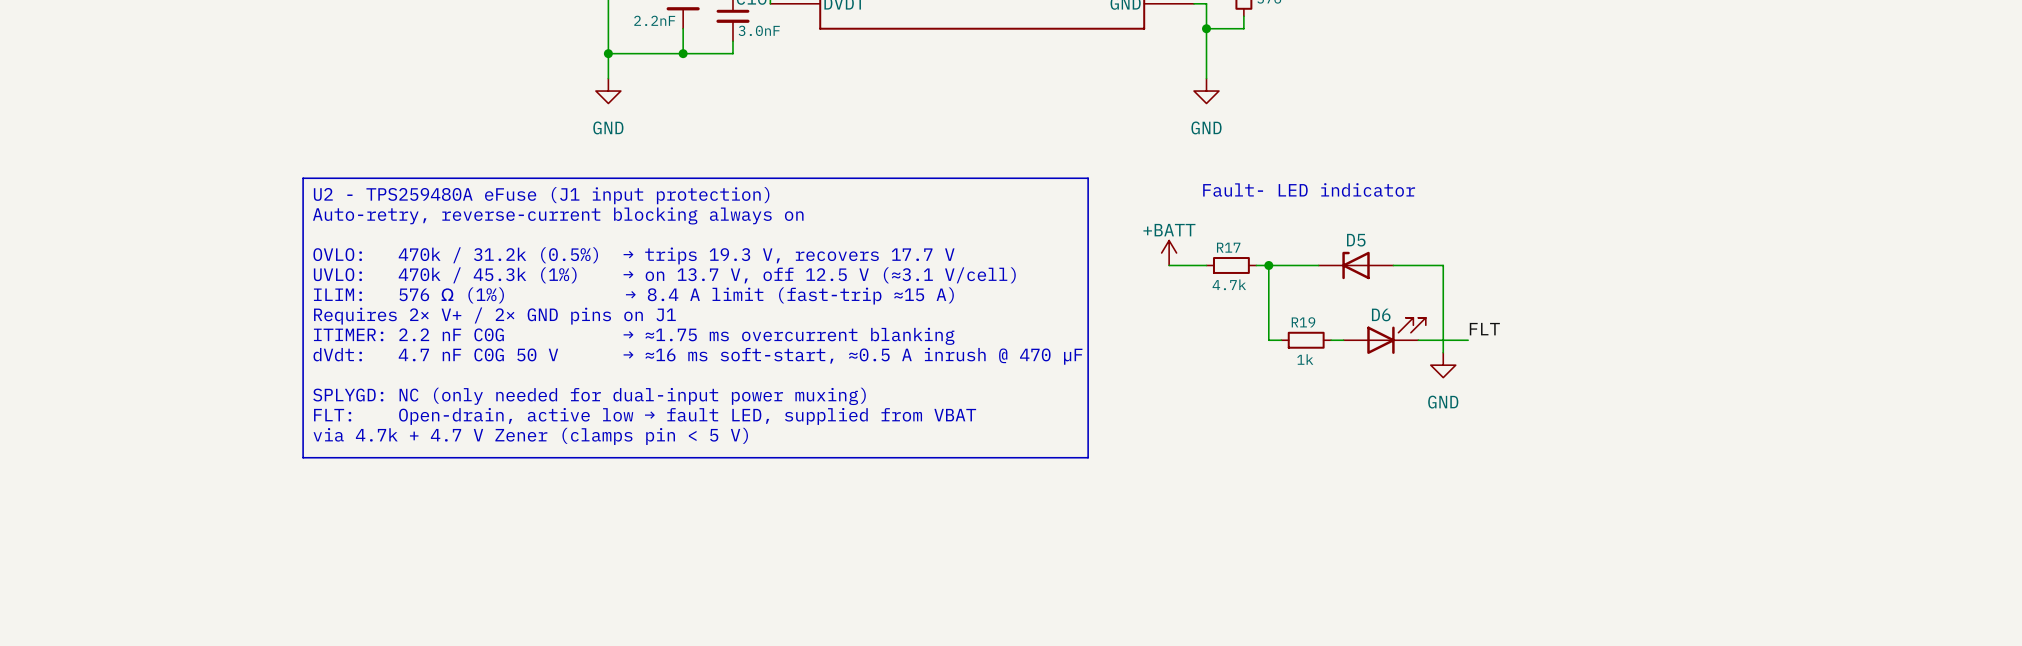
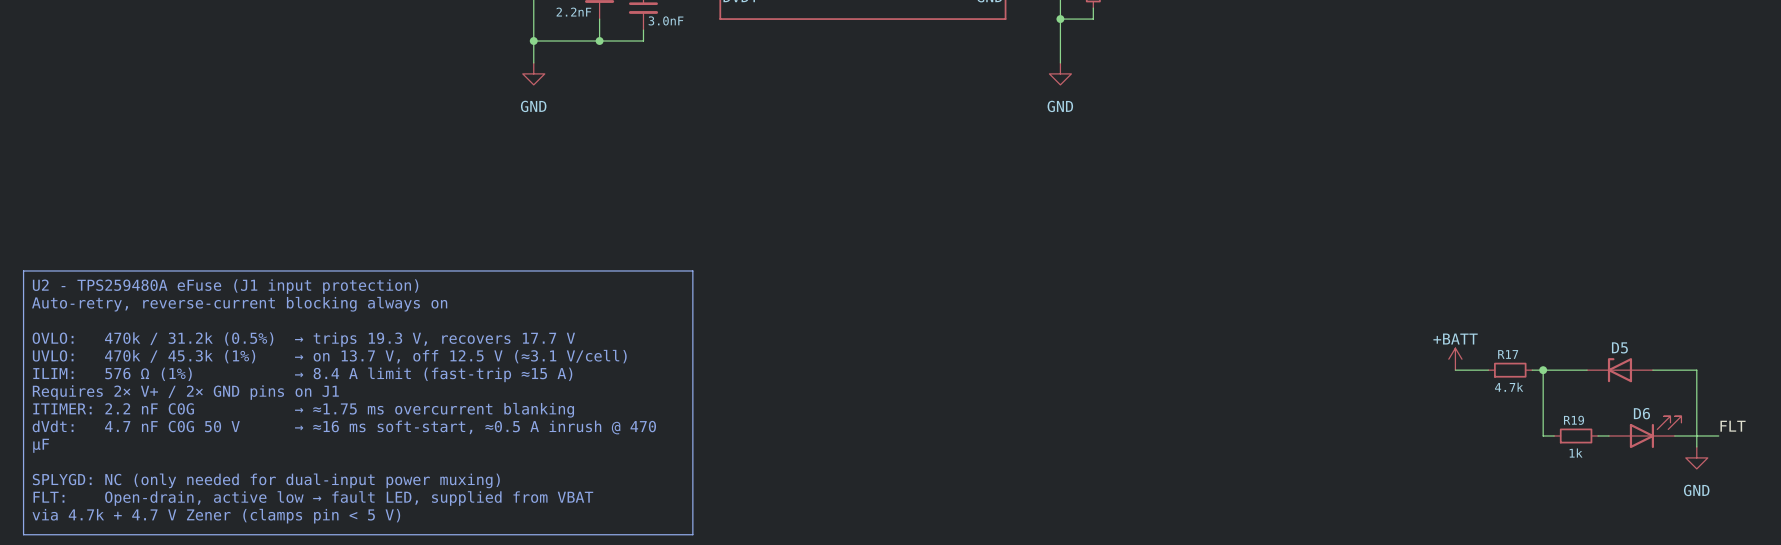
line: (303, 178) (1088, 178) (1088, 457) (303, 457) (303, 178) -> none
text: Fault- LED indicator (1309, 189) -> none
text: U2 - TPS259480A eFuse (J1 input protection) (541, 195) -> none
text: Auto-retry, reverse-current blocking always on (558, 215) -> none
power symbol: +BATT (1169, 253) -> none
text: OVLO: 470k / 31.2k (0.5%) → trips 19.3 V, recovers 17.7 V (633, 255) -> none
wire: (1169, 265) (1206, 265) -> none
R17 position: (1231, 265) -> (1510, 370)
wire: (1256, 265) (1318, 265) -> none
wire: (1268, 265) (1268, 340) (1281, 340) -> none
junction: (1268, 265) -> none
D5 position: (1356, 265) -> (1619, 370)
wire: (1393, 265) (1443, 265) (1443, 352) -> none
text: UVLO: 470k / 45.3k (1%) → on 13.7 V, off 12.5 V (≈3.1 V/cell) (664, 275) -> none
text: ILIM: 576 Ω (1%) → 8.4 A limit (fast-trip ≈15 A) (633, 295) -> none
line: none -> (23, 270) (692, 270) (692, 534) (23, 534) (23, 270)
text: Requires 2× V+ / 2× GND pins on J1 (494, 316) -> none
label: FLT (1484, 329) -> none
text: none -> U2 - TPS259480A eFuse (J1 input protection) (225, 286)
D6 position: (1384, 335) -> (1645, 432)
text: ITIMER: 2.2 nF C0G → ≈1.75 ms overcurrent blanking (634, 336) -> none
R19 position: (1306, 340) -> (1576, 435)
wire: (1331, 340) (1343, 340) -> none
wire: (1418, 340) (1468, 340) -> none
text: none -> Auto-retry, reverse-current blocking always on (239, 304)
text: dVdt: 4.7 nF C0G 50 V → ≈16 ms soft-start, ≈0.5 A inrush @ 470 µF (697, 356) -> none
power symbol: GND (1443, 365) -> none
text: none -> OVLO: 470k / 31.2k (0.5%) → trips 19.3 V, recovers 17.7 V (303, 339)
text: SPLYGD: NC (only needed for dual-input power muxing) (589, 396) -> none
text: none -> UVLO: 470k / 45.3k (1%) → on 13.7 V, off 12.5 V (≈3.1 V/cell) (329, 356)
power symbol: none -> +BATT (1455, 359)
text: FLT: Open-drain, active low → fault LED, supplied from VBAT (645, 416) -> none
wire: none -> (1455, 370) (1488, 370)
wire: none -> (1532, 370) (1587, 370)
wire: none -> (1543, 370) (1543, 435) (1554, 435)
junction: none -> (1543, 370)
wire: none -> (1652, 370) (1696, 370) (1696, 446)
text: none -> ILIM: 576 Ω (1%) → 8.4 A limit (fast-trip ≈15 A) (302, 374)
text: via 4.7k + 4.7 V Zener (clamps pin < 5 V) (530, 436) -> none
text: none -> Requires 2× V+ / 2× GND pins on J1 (185, 392)
text: none -> ITIMER: 2.2 nF C0G → ≈1.75 ms overcurrent blanking (303, 410)
label: none -> FLT (1733, 426)
text: none -> dVdt: 4.7 nF C0G 50 V → ≈16 ms soft-start, ≈0.5 A inrush @ 470 (344, 427)
wire: none -> (1598, 435) (1609, 435)
wire: none -> (1674, 435) (1718, 435)
text: none -> µF (41, 445)
power symbol: none -> GND (1696, 457)
text: none -> SPLYGD: NC (only needed for dual-input power muxing) (266, 480)
text: none -> FLT: Open-drain, active low → fault LED, supplied from VBAT (313, 498)
text: none -> via 4.7k + 4.7 V Zener (clamps pin < 5 V) (216, 516)

